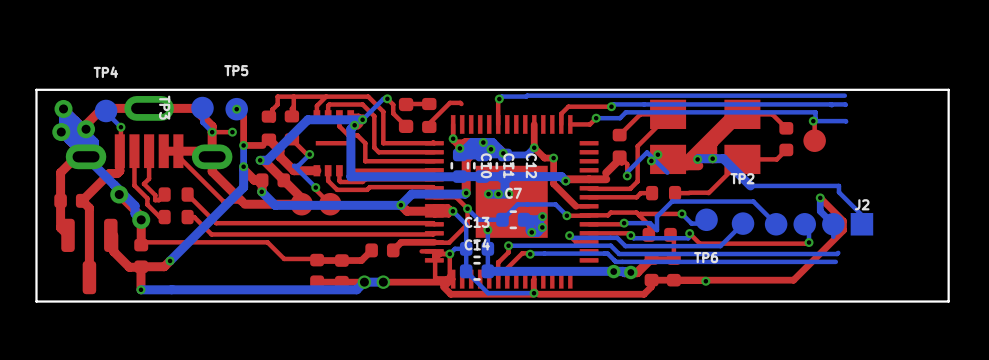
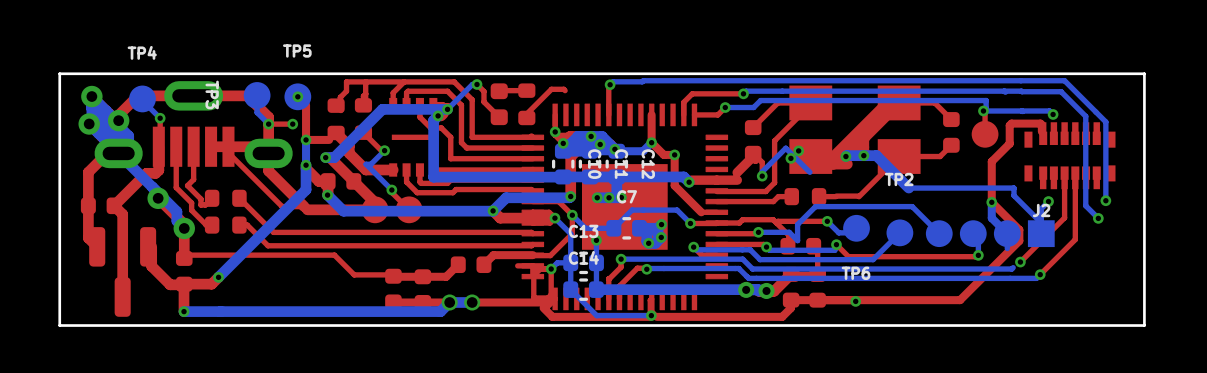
bottom track: none -> (1020, 80) (1064, 80) (1105, 121) (1105, 200)
bottom track: none -> (1022, 91) (1061, 91) (1085, 116) (1085, 205) (1098, 218)
bottom track: none -> (1022, 110) (1049, 110) (1053, 114)
via: none -> (1053, 114)
top track: none -> (1041, 131) (1040, 123) (1011, 123) (1009, 125) (1009, 143) (991, 161) (991, 202)
part: none -> (1069, 155)
top track: none -> (1064, 179) (1064, 217) (1020, 262)
top track: none -> (1075, 179) (1075, 239) (1040, 274)
via: none -> (1105, 200)
bottom track: none -> (1048, 201) (1041, 208) (1041, 222)
via: none -> (1048, 201)
via: none -> (1098, 218)
via: none -> (1020, 262)
bottom track: none -> (1040, 274) (1036, 278) (1010, 278)
via: none -> (1040, 274)

